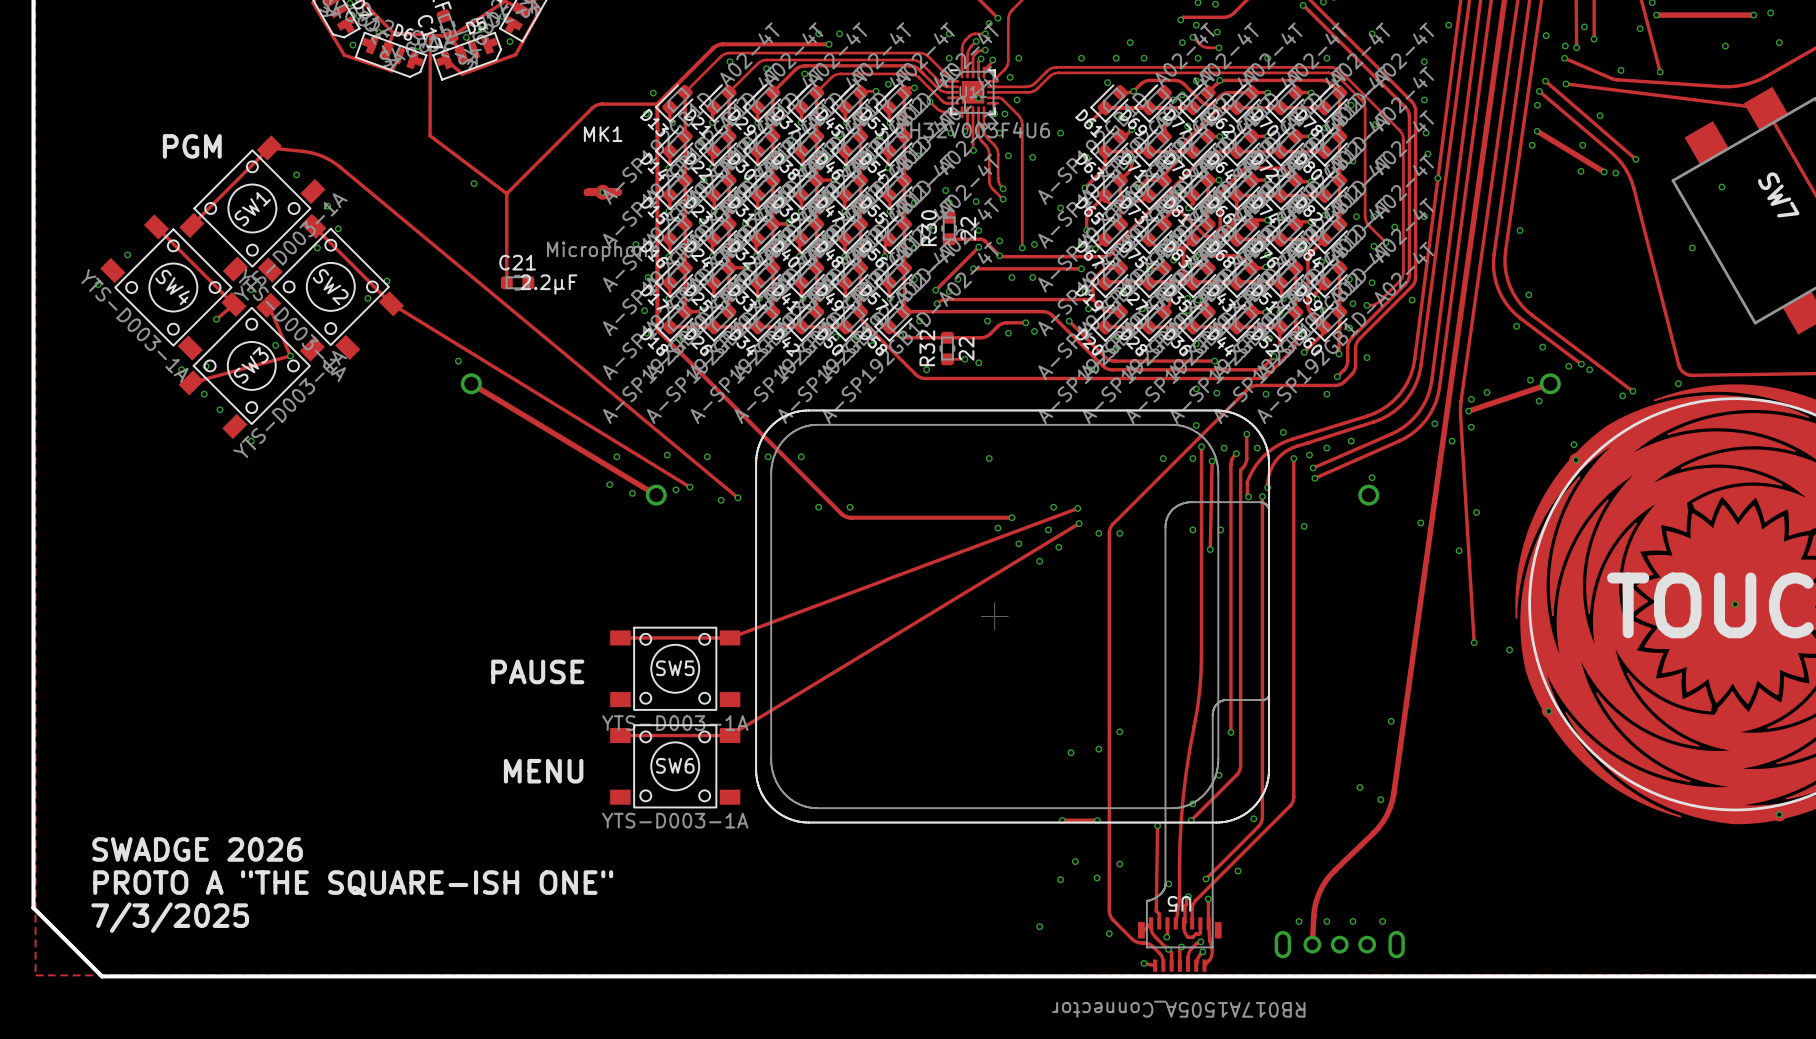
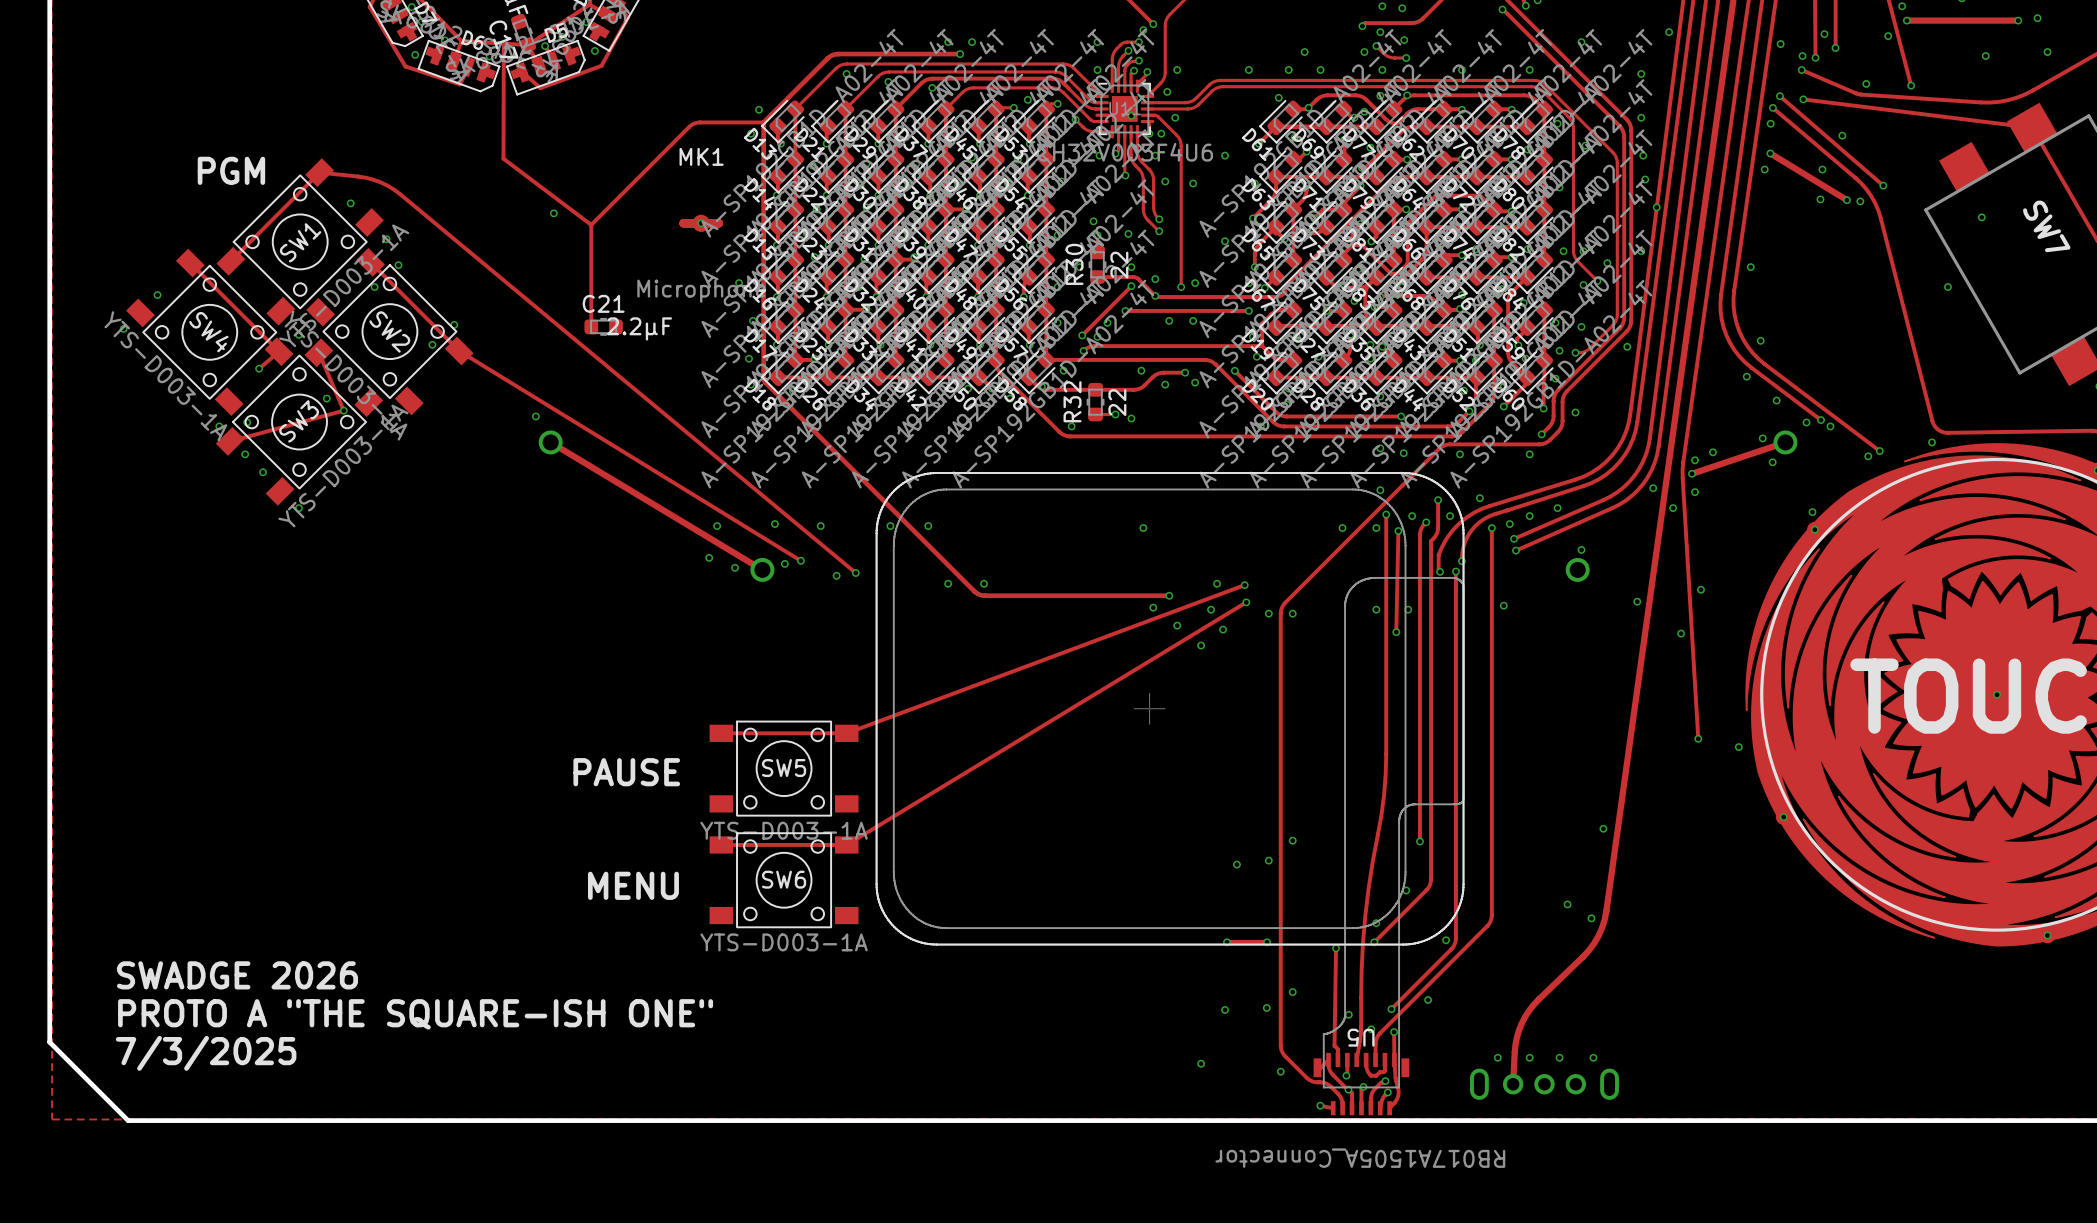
via: (1075, 861) -> none
track: (1188, 896) (1184, 905) (1183, 923) -> none

